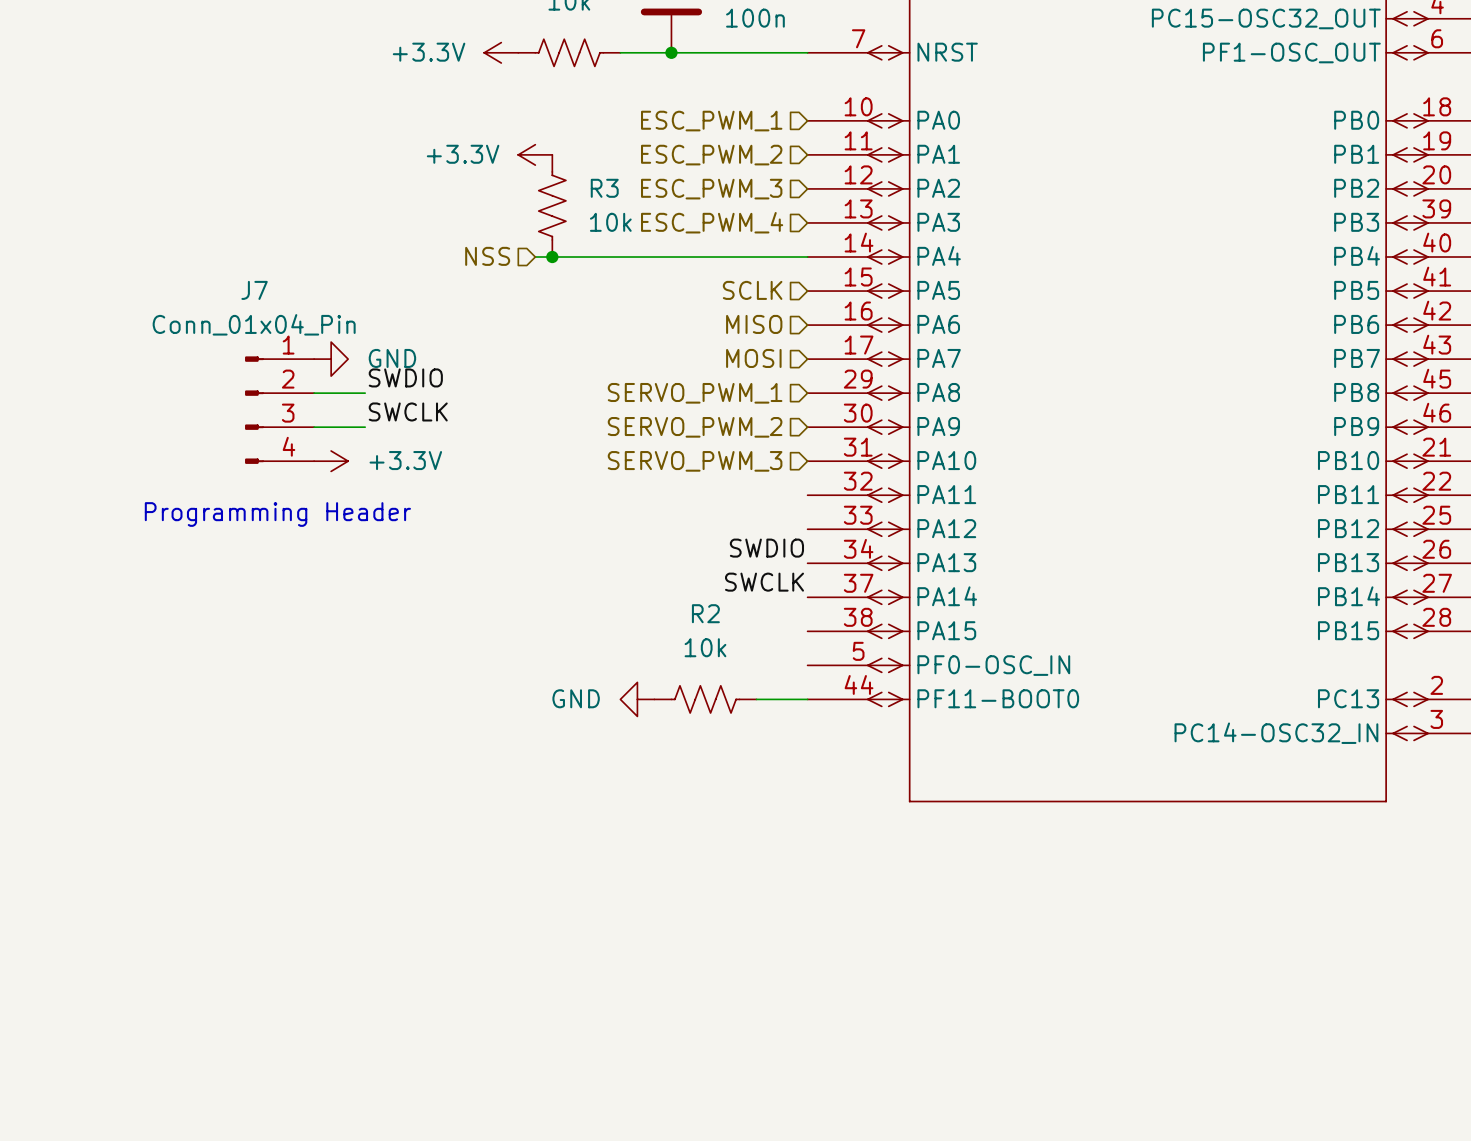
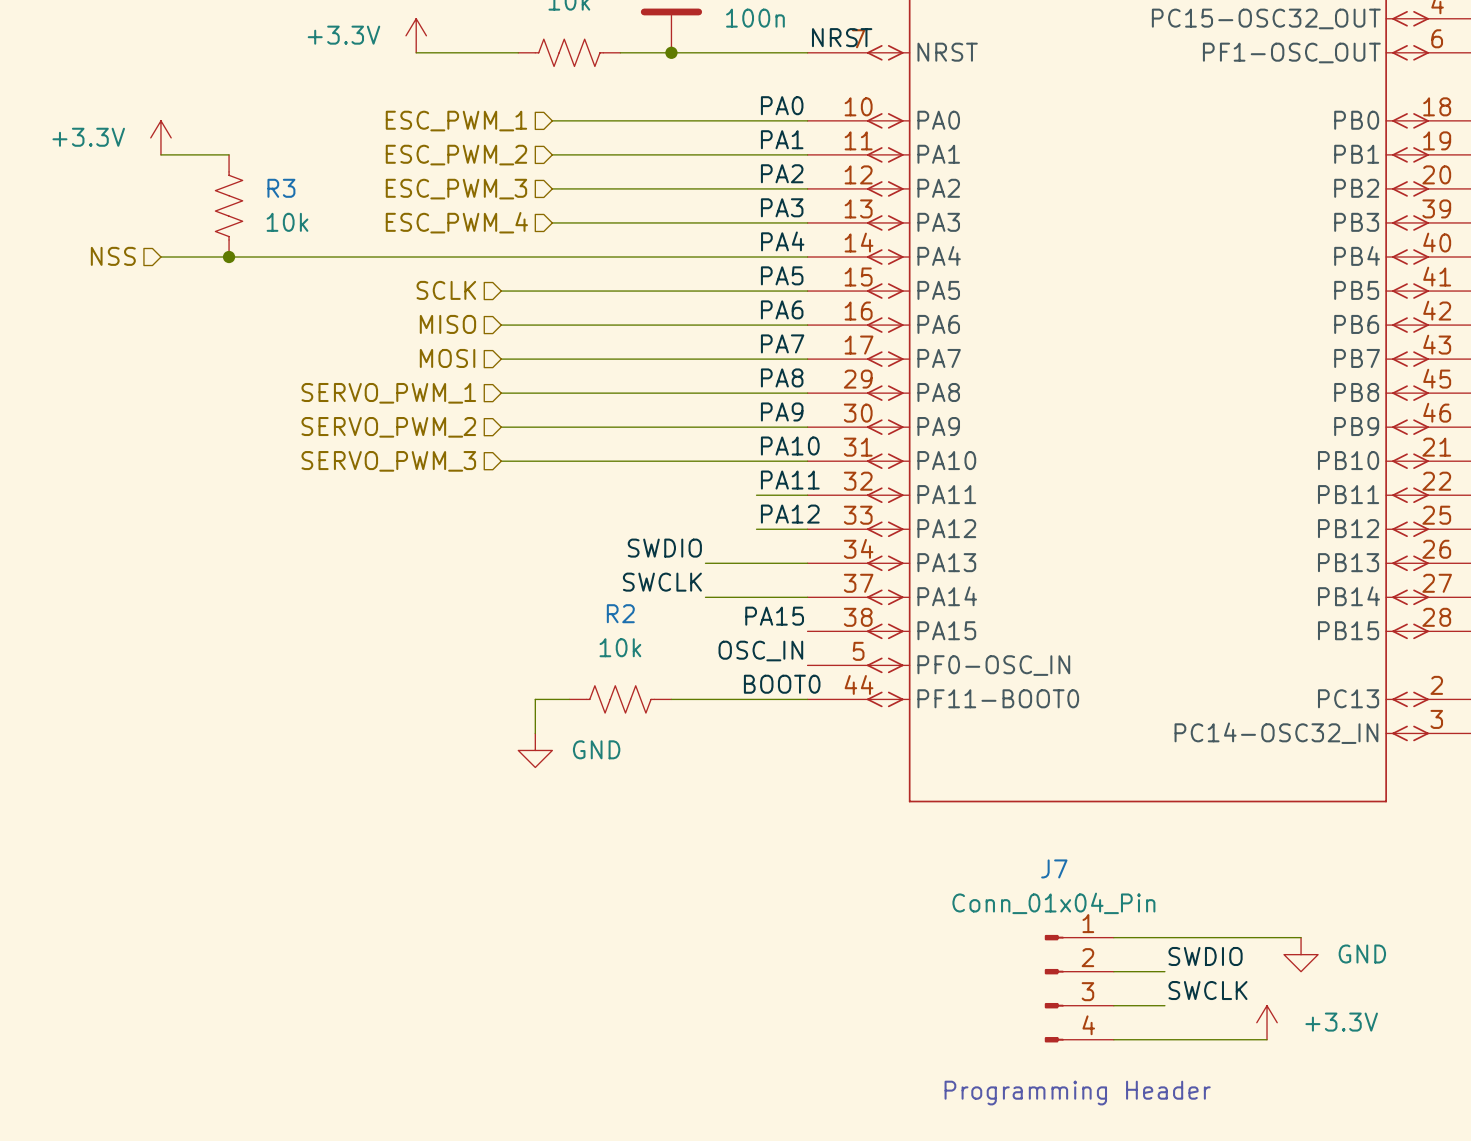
power symbol: none -> +3.3V (416, 35)
label: none -> NRST (842, 37)
wire: none -> (416, 52) (518, 52)
power symbol: +3.3V (501, 52) -> none
label: none -> PA0 (782, 105)
wire: none -> (552, 120) (807, 120)
hierarchical label position: ESC_PWM_1 (711, 121) -> ESC_PWM_1 (456, 121)
power symbol: none -> +3.3V (160, 137)
label: none -> PA1 (782, 139)
wire: none -> (160, 154) (229, 154)
power symbol: +3.3V (535, 154) -> none
wire: none -> (552, 154) (807, 154)
hierarchical label position: ESC_PWM_2 (711, 155) -> ESC_PWM_2 (456, 155)
label: none -> PA2 (782, 173)
wire: none -> (552, 188) (807, 188)
hierarchical label position: ESC_PWM_3 (711, 189) -> ESC_PWM_3 (456, 189)
R3 position: (552, 205) -> (229, 205)
label: none -> PA3 (782, 207)
wire: none -> (552, 222) (807, 222)
hierarchical label position: ESC_PWM_4 (712, 222) -> ESC_PWM_4 (456, 222)
label: none -> PA4 (782, 241)
hierarchical label: none -> NSS (113, 256)
hierarchical label: NSS (487, 256) -> none
wire: none -> (160, 257) (535, 257)
junction: none -> (229, 257)
junction: (552, 257) -> none
label: none -> PA5 (782, 275)
hierarchical label position: SCLK (752, 290) -> SCLK (446, 290)
wire: none -> (501, 291) (807, 291)
label: none -> PA6 (782, 309)
hierarchical label position: MISO (754, 324) -> MISO (447, 324)
wire: none -> (501, 325) (807, 325)
label: none -> PA7 (782, 343)
hierarchical label position: MOSI (753, 358) -> MOSI (447, 358)
power symbol: GND (331, 359) -> none
wire: none -> (501, 359) (807, 359)
label: SWDIO (405, 377) -> none
label: none -> PA8 (782, 377)
wire: (314, 393) (365, 393) -> none
wire: none -> (501, 393) (807, 393)
hierarchical label position: SERVO_PWM_1 (695, 393) -> SERVO_PWM_1 (388, 393)
J7 position: (279, 410) -> (1079, 988)
label: SWCLK (408, 411) -> none
label: none -> PA9 (782, 411)
wire: (314, 427) (365, 427) -> none
wire: none -> (501, 427) (807, 427)
hierarchical label position: SERVO_PWM_2 (695, 427) -> SERVO_PWM_2 (388, 427)
label: none -> PA10 (790, 446)
power symbol: +3.3V (331, 461) -> none
wire: none -> (501, 461) (807, 461)
hierarchical label position: SERVO_PWM_3 (695, 461) -> SERVO_PWM_3 (388, 461)
label: none -> PA11 (790, 480)
wire: none -> (756, 495) (807, 495)
text: Programming Header (277, 514) -> none
label: none -> PA12 (790, 514)
wire: none -> (756, 529) (807, 529)
label position: SWDIO (766, 548) -> SWDIO (664, 548)
wire: none -> (705, 563) (807, 563)
label position: SWCLK (764, 582) -> SWCLK (662, 582)
wire: none -> (705, 597) (807, 597)
label: none -> PA15 (774, 616)
label: none -> OSC_IN (760, 651)
label: none -> BOOT0 (782, 684)
power symbol text position: GND (576, 698) -> GND (596, 749)
wire: none -> (569, 699) (535, 699) (535, 733)
power symbol rotation: 0° (637, 699) -> 90° counterclockwise (535, 750)
power symbol position: GND (637, 699) -> GND (535, 750)
wire: none -> (671, 699) (756, 699)
R2 position: (705, 699) -> (620, 699)
wire: none -> (1113, 937) (1301, 937)
power symbol: none -> GND (1301, 954)
label: none -> SWDIO (1205, 956)
wire: none -> (1113, 971) (1164, 971)
label: none -> SWCLK (1207, 990)
wire: none -> (1113, 1005) (1164, 1005)
power symbol: none -> +3.3V (1267, 1022)
wire: none -> (1113, 1039) (1267, 1039)
text: none -> Programming Header (1077, 1093)

